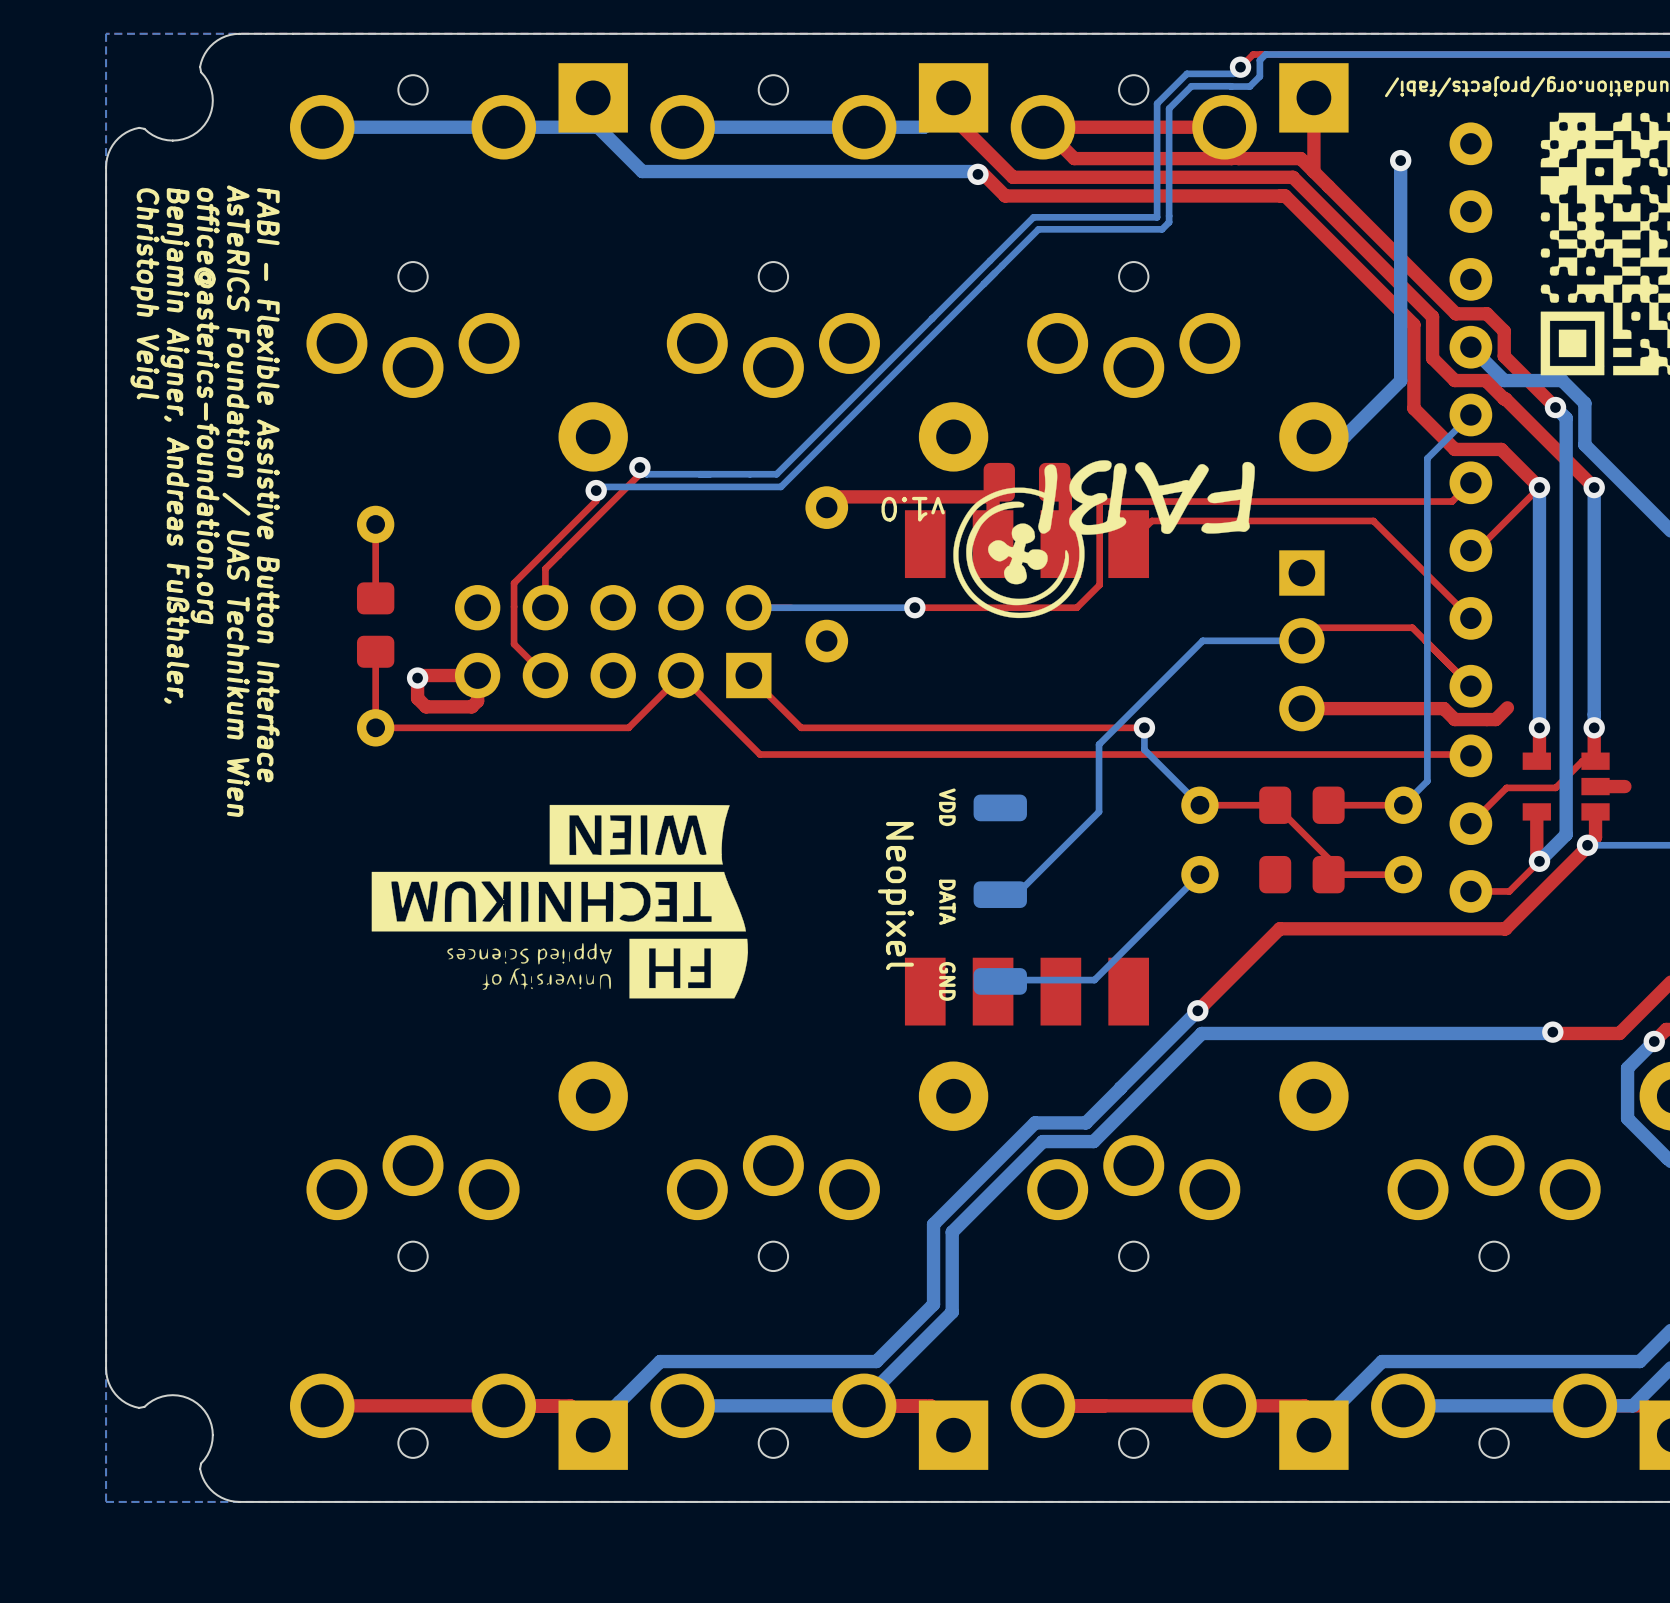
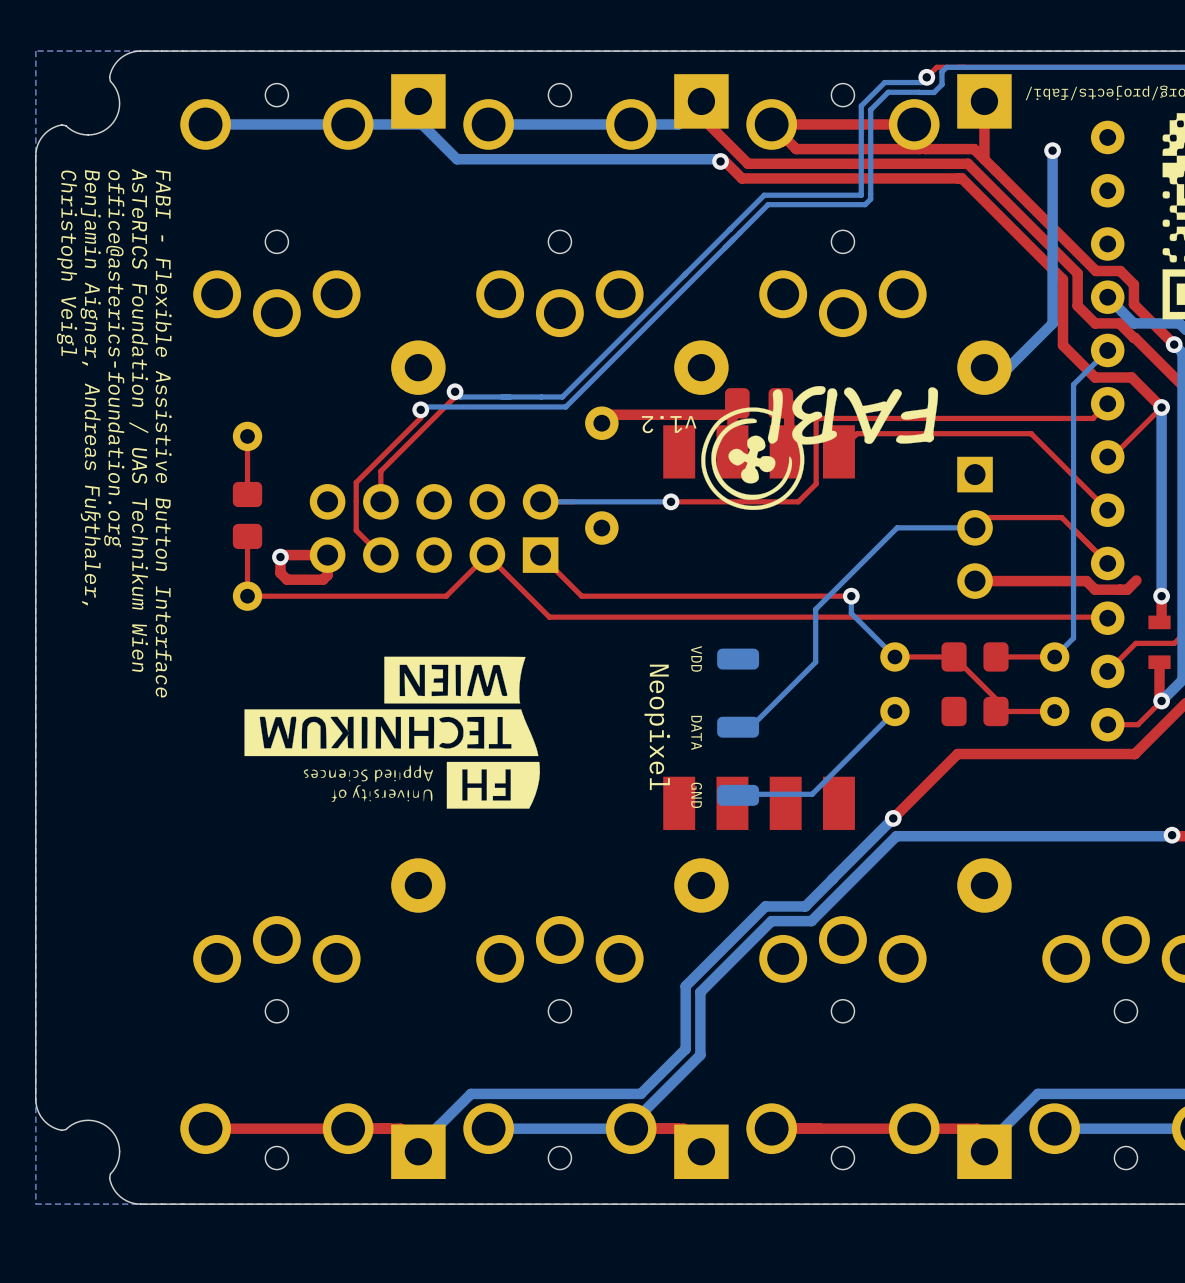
text: v1.0 (913, 509) -> v1.2 (669, 424)

